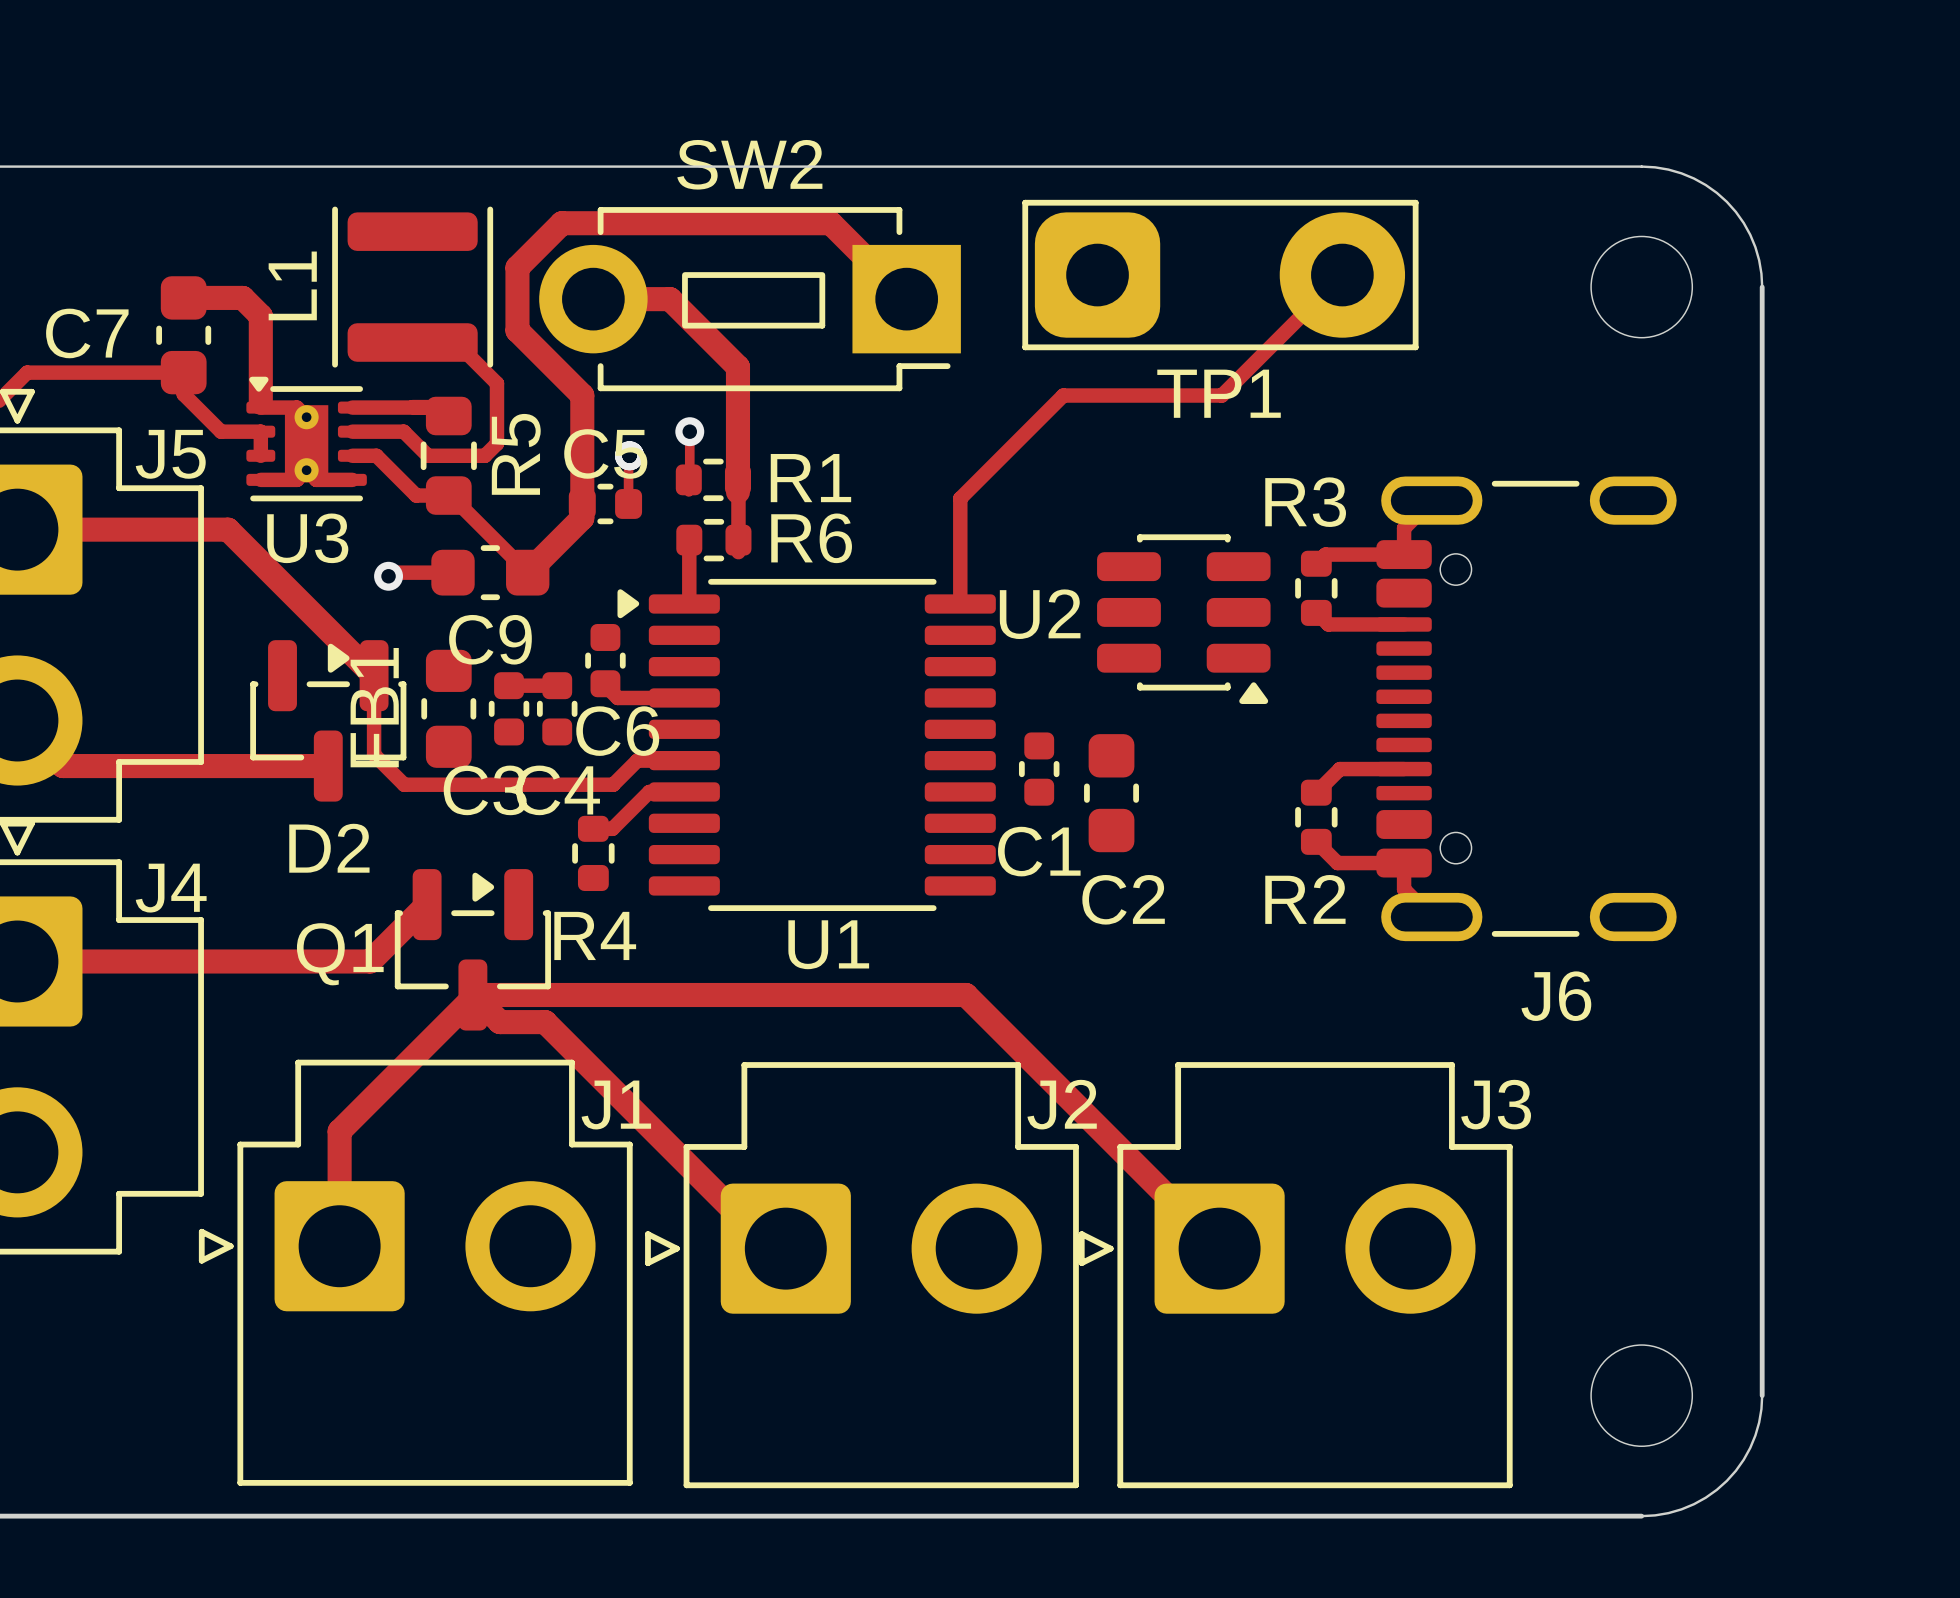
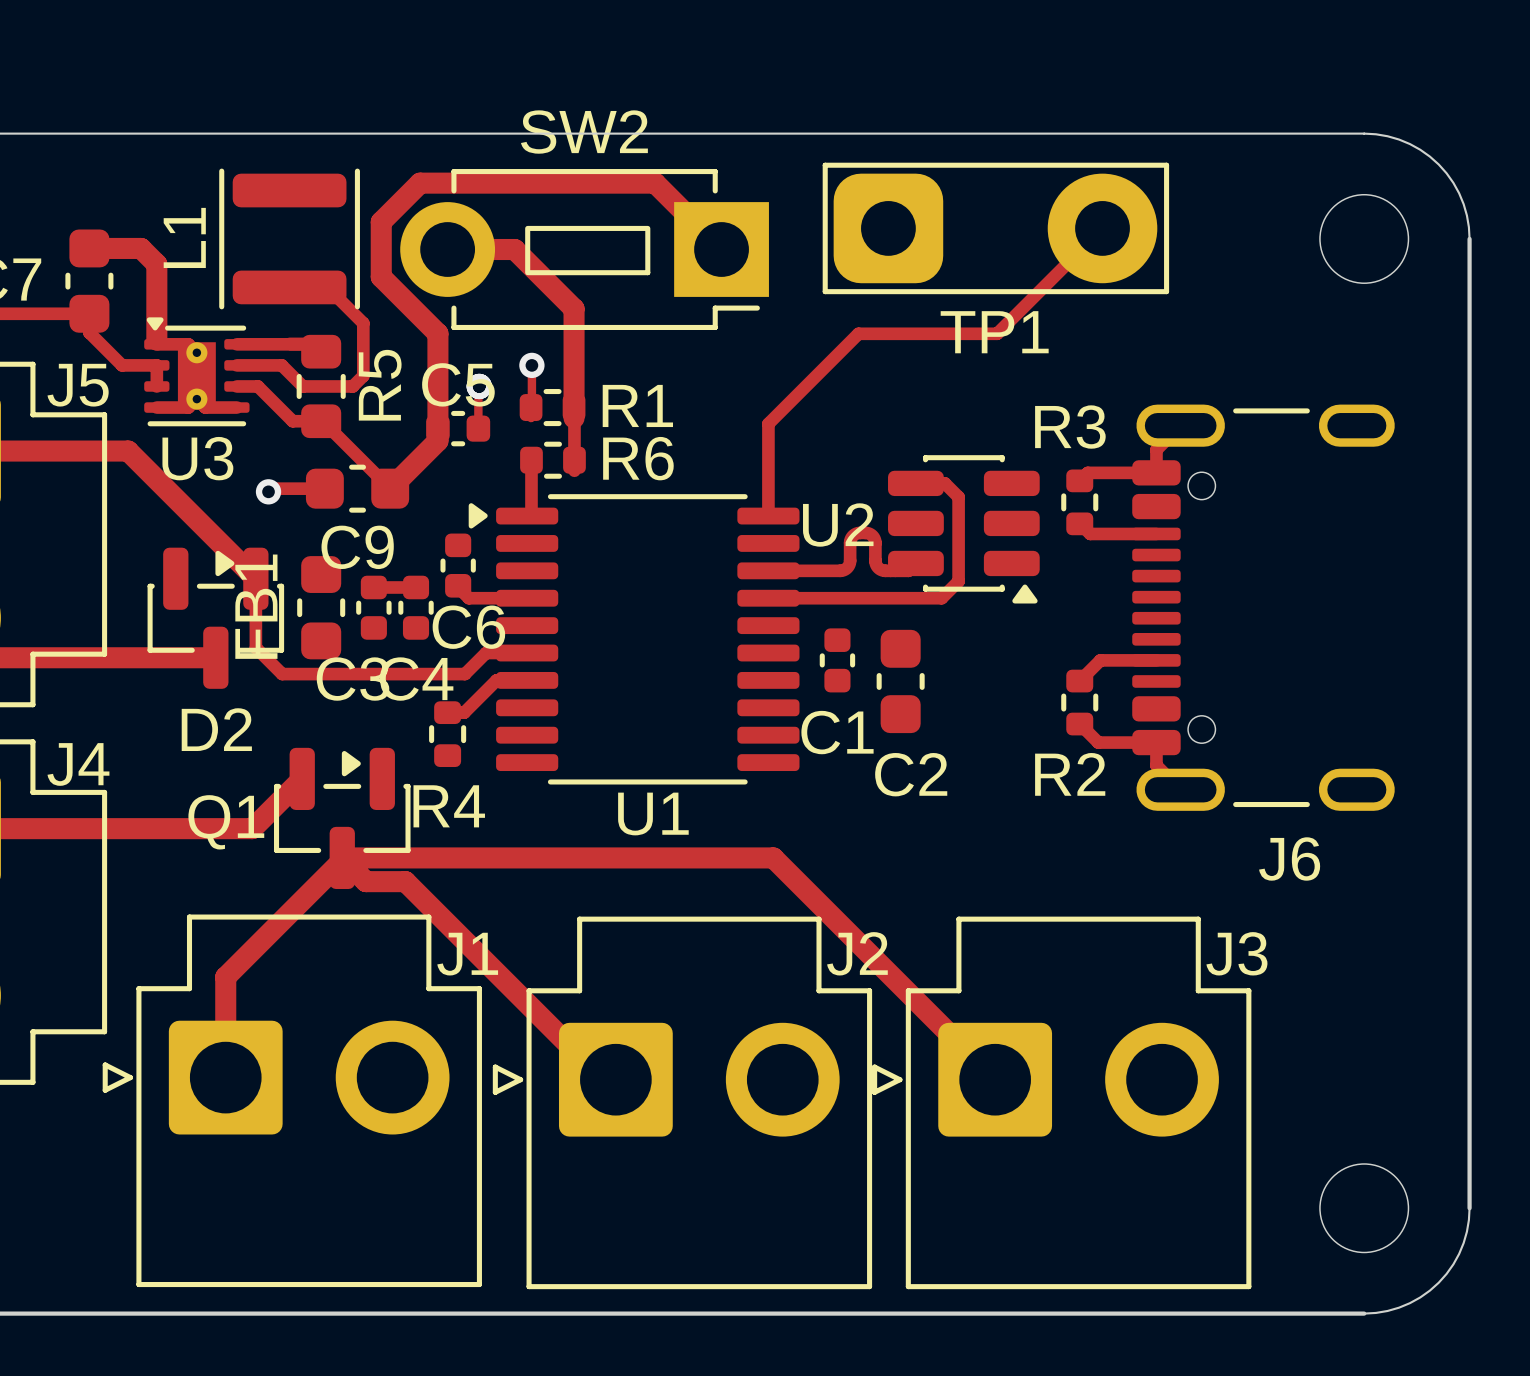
track: none -> (915, 483) (944, 483) (958, 497) (958, 581) (941, 598) (768, 598)
track: none -> (915, 563) (908, 570) (881, 569) (875, 562) (873, 537) (868, 533) (860, 532) (854, 534) (851, 538) (849, 562) (843, 570) (768, 570)

